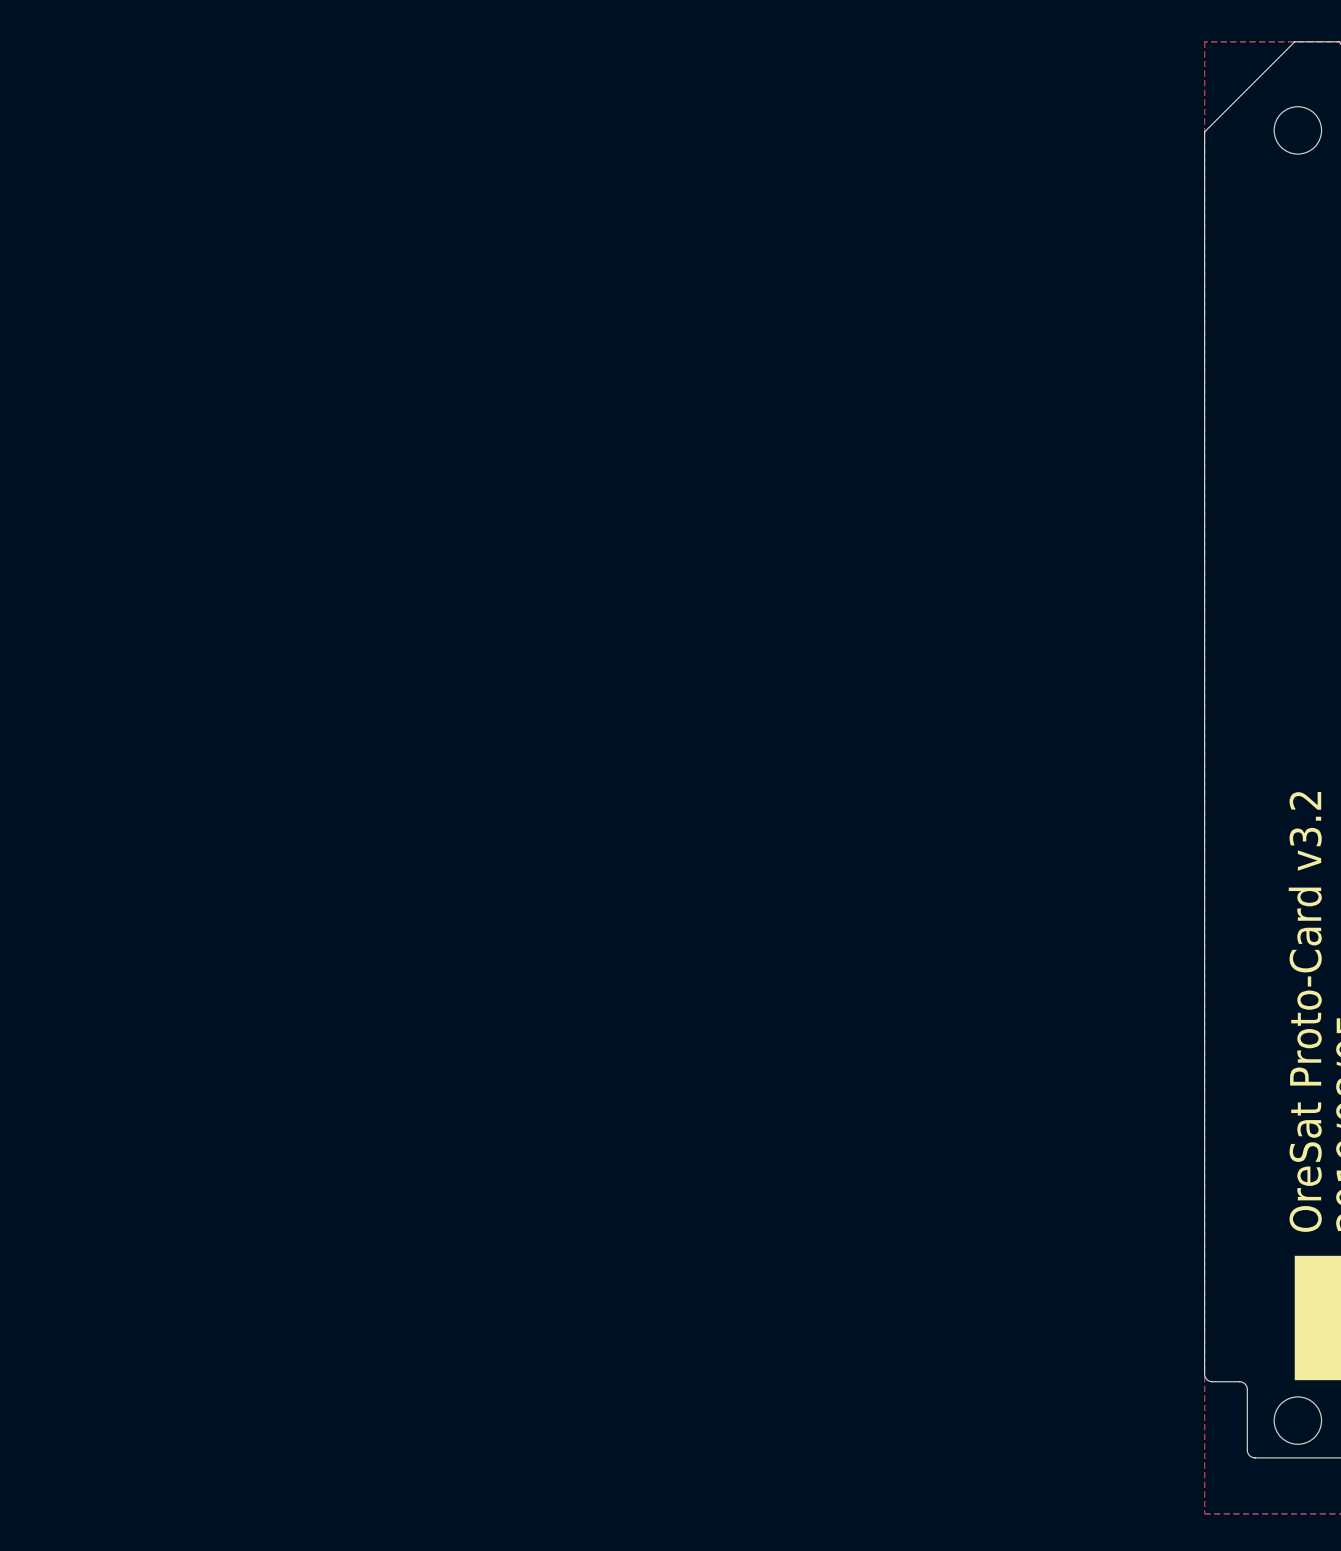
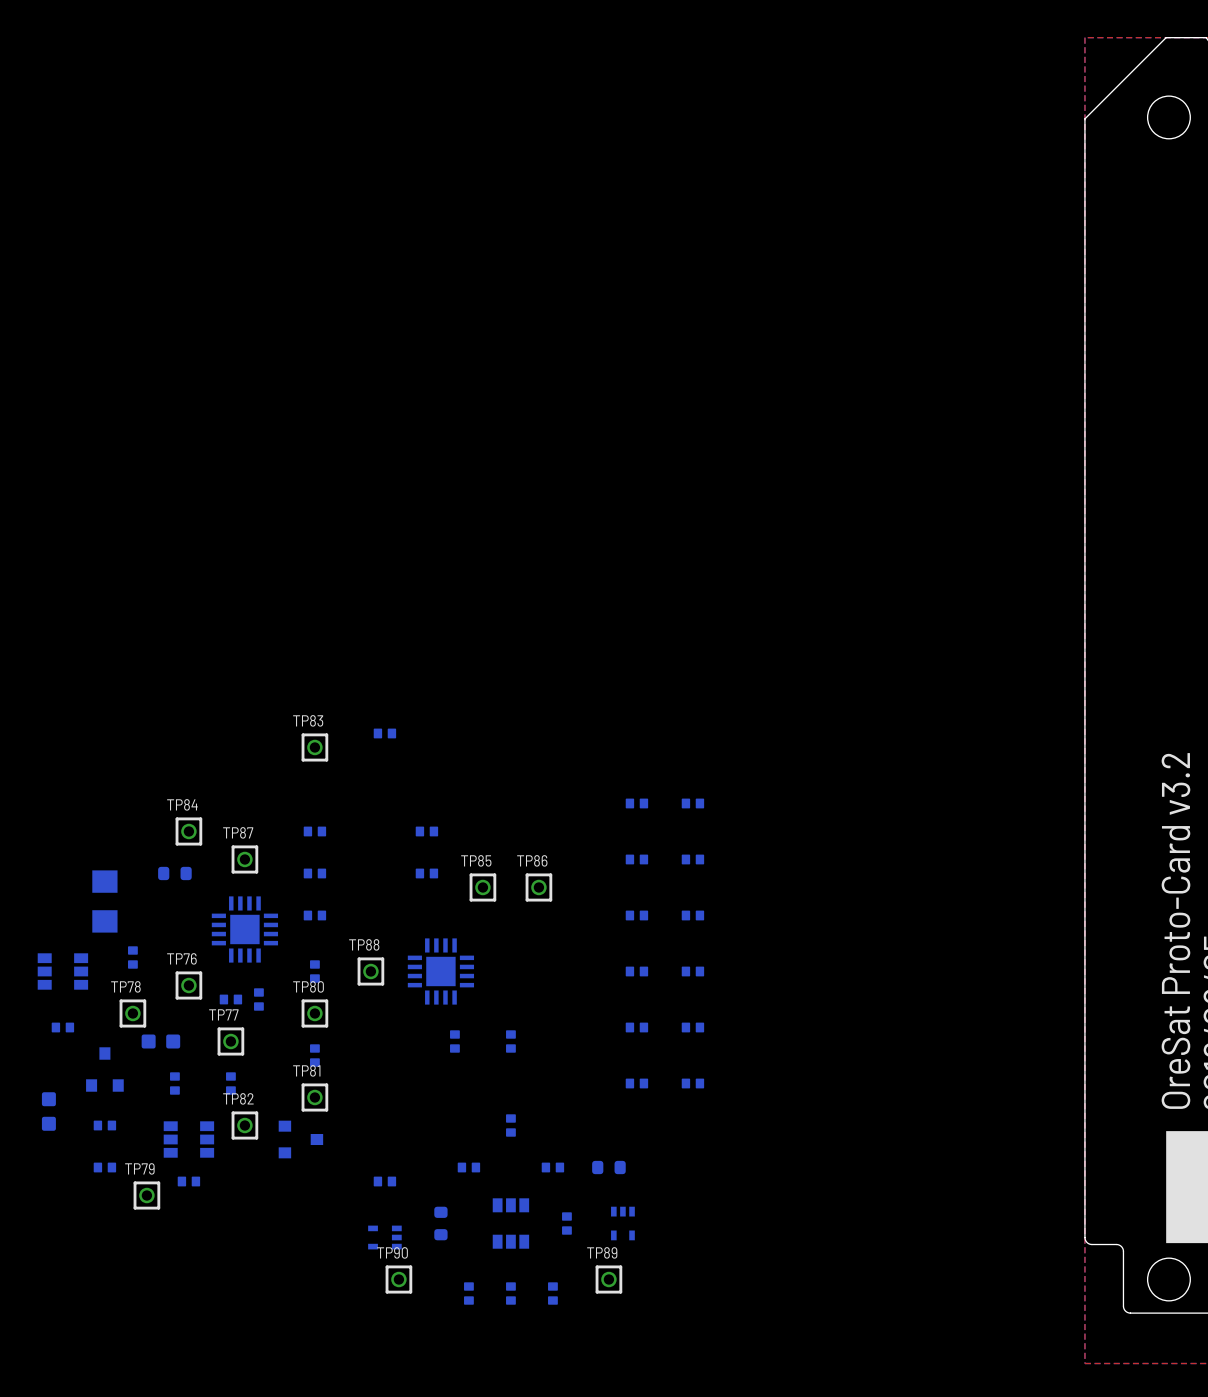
part: none -> (384, 733)
TP83: none -> (314, 747)
part: none -> (636, 803)
part: none -> (692, 803)
TP84: none -> (188, 831)
part: none -> (314, 831)
part: none -> (426, 831)
TP87: none -> (244, 859)
part: none -> (636, 859)
part: none -> (692, 859)
part: none -> (174, 873)
part: none -> (314, 873)
part: none -> (426, 873)
TP85: none -> (482, 887)
TP86: none -> (538, 887)
part: none -> (104, 901)
part: none -> (314, 915)
part: none -> (636, 915)
part: none -> (692, 915)
part: none -> (244, 929)
part: none -> (132, 957)
part: none -> (62, 971)
part: none -> (314, 971)
TP88: none -> (370, 971)
part: none -> (440, 971)
part: none -> (636, 971)
part: none -> (692, 971)
TP76: none -> (188, 985)
part: none -> (230, 999)
part: none -> (258, 999)
TP78: none -> (132, 1013)
TP80: none -> (314, 1013)
part: none -> (62, 1027)
part: none -> (636, 1027)
part: none -> (692, 1027)
part: none -> (160, 1041)
TP77: none -> (230, 1041)
part: none -> (454, 1041)
part: none -> (510, 1041)
part: none -> (314, 1055)
part: none -> (104, 1069)
part: none -> (174, 1083)
part: none -> (230, 1083)
part: none -> (636, 1083)
part: none -> (692, 1083)
TP81: none -> (314, 1097)
part: none -> (48, 1111)
part: none -> (104, 1125)
TP82: none -> (244, 1125)
part: none -> (510, 1125)
part: none -> (188, 1139)
part: none -> (300, 1139)
part: none -> (104, 1167)
part: none -> (468, 1167)
part: none -> (552, 1167)
part: none -> (608, 1167)
part: none -> (188, 1181)
part: none -> (384, 1181)
TP79: none -> (146, 1195)
part: none -> (440, 1223)
part: none -> (510, 1223)
part: none -> (566, 1223)
part: none -> (622, 1223)
part: none -> (384, 1237)
TP90: none -> (398, 1279)
TP89: none -> (608, 1279)
part: none -> (468, 1293)
part: none -> (510, 1293)
part: none -> (552, 1293)

